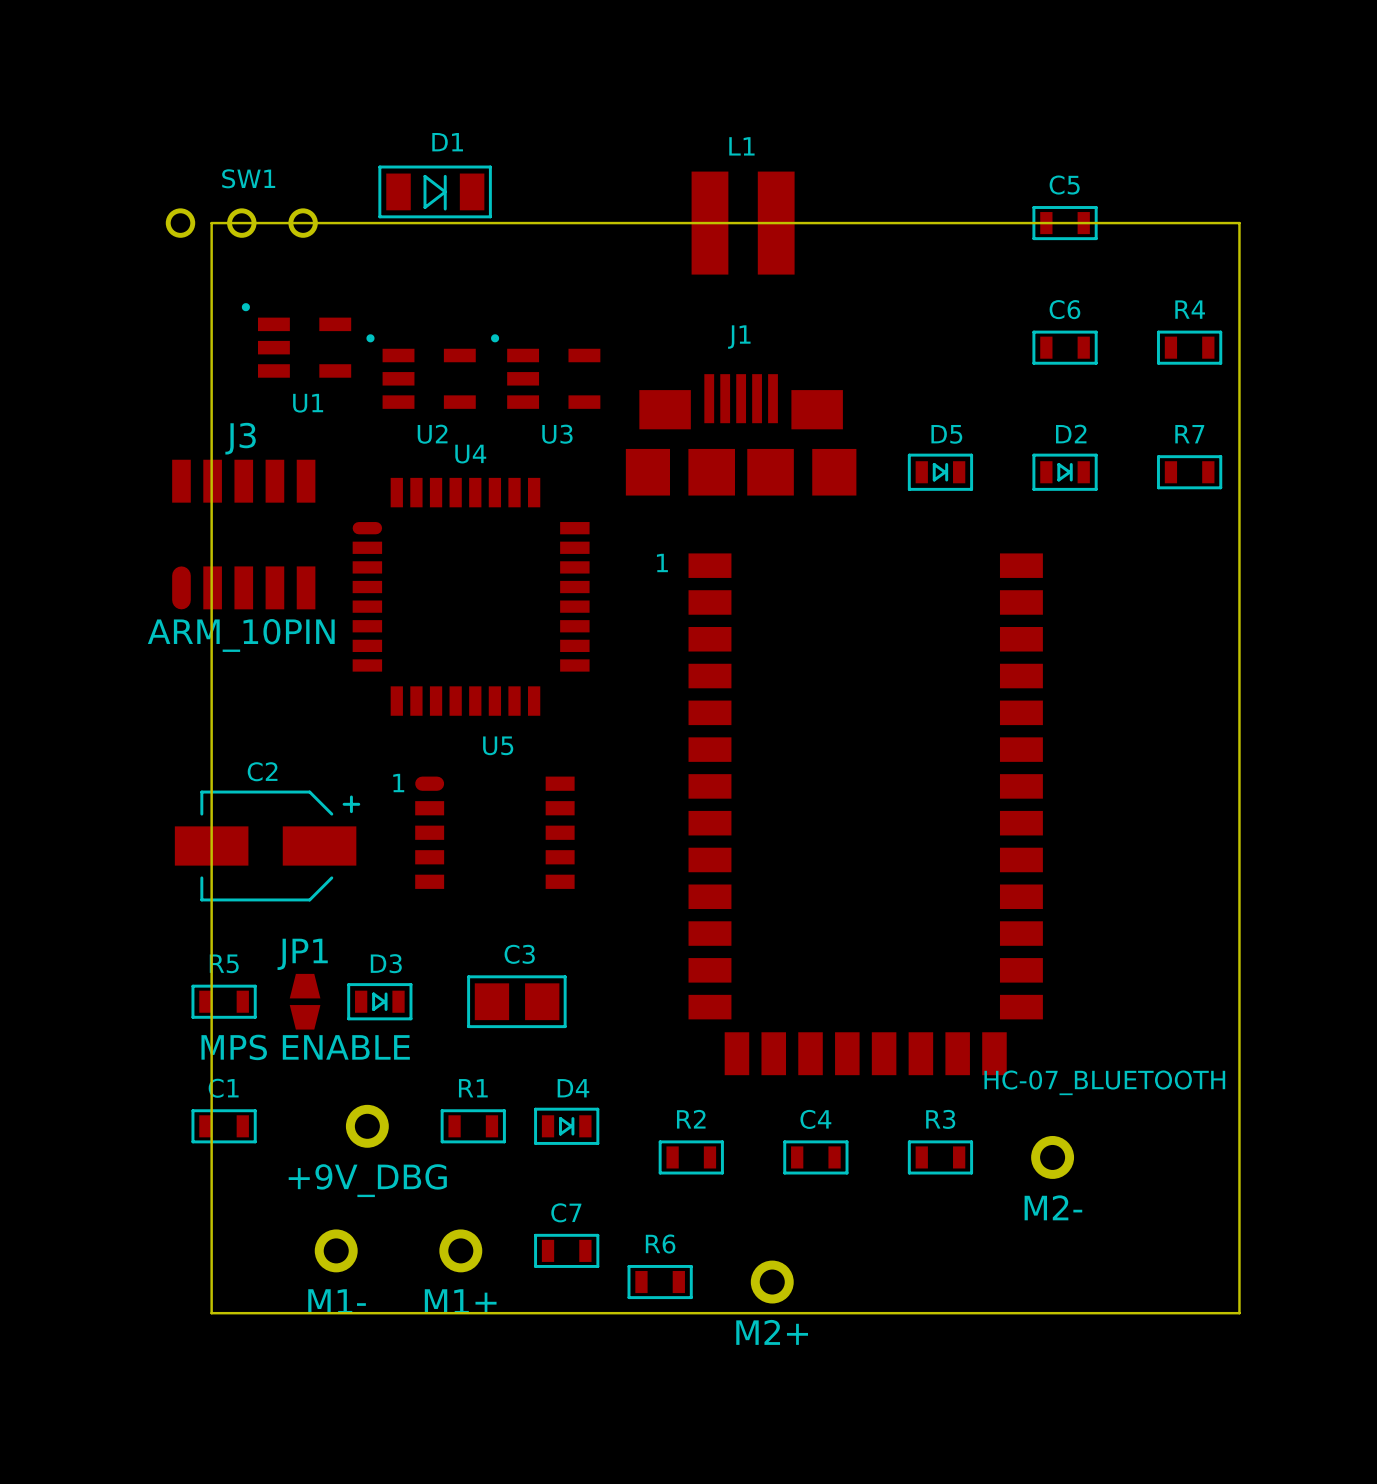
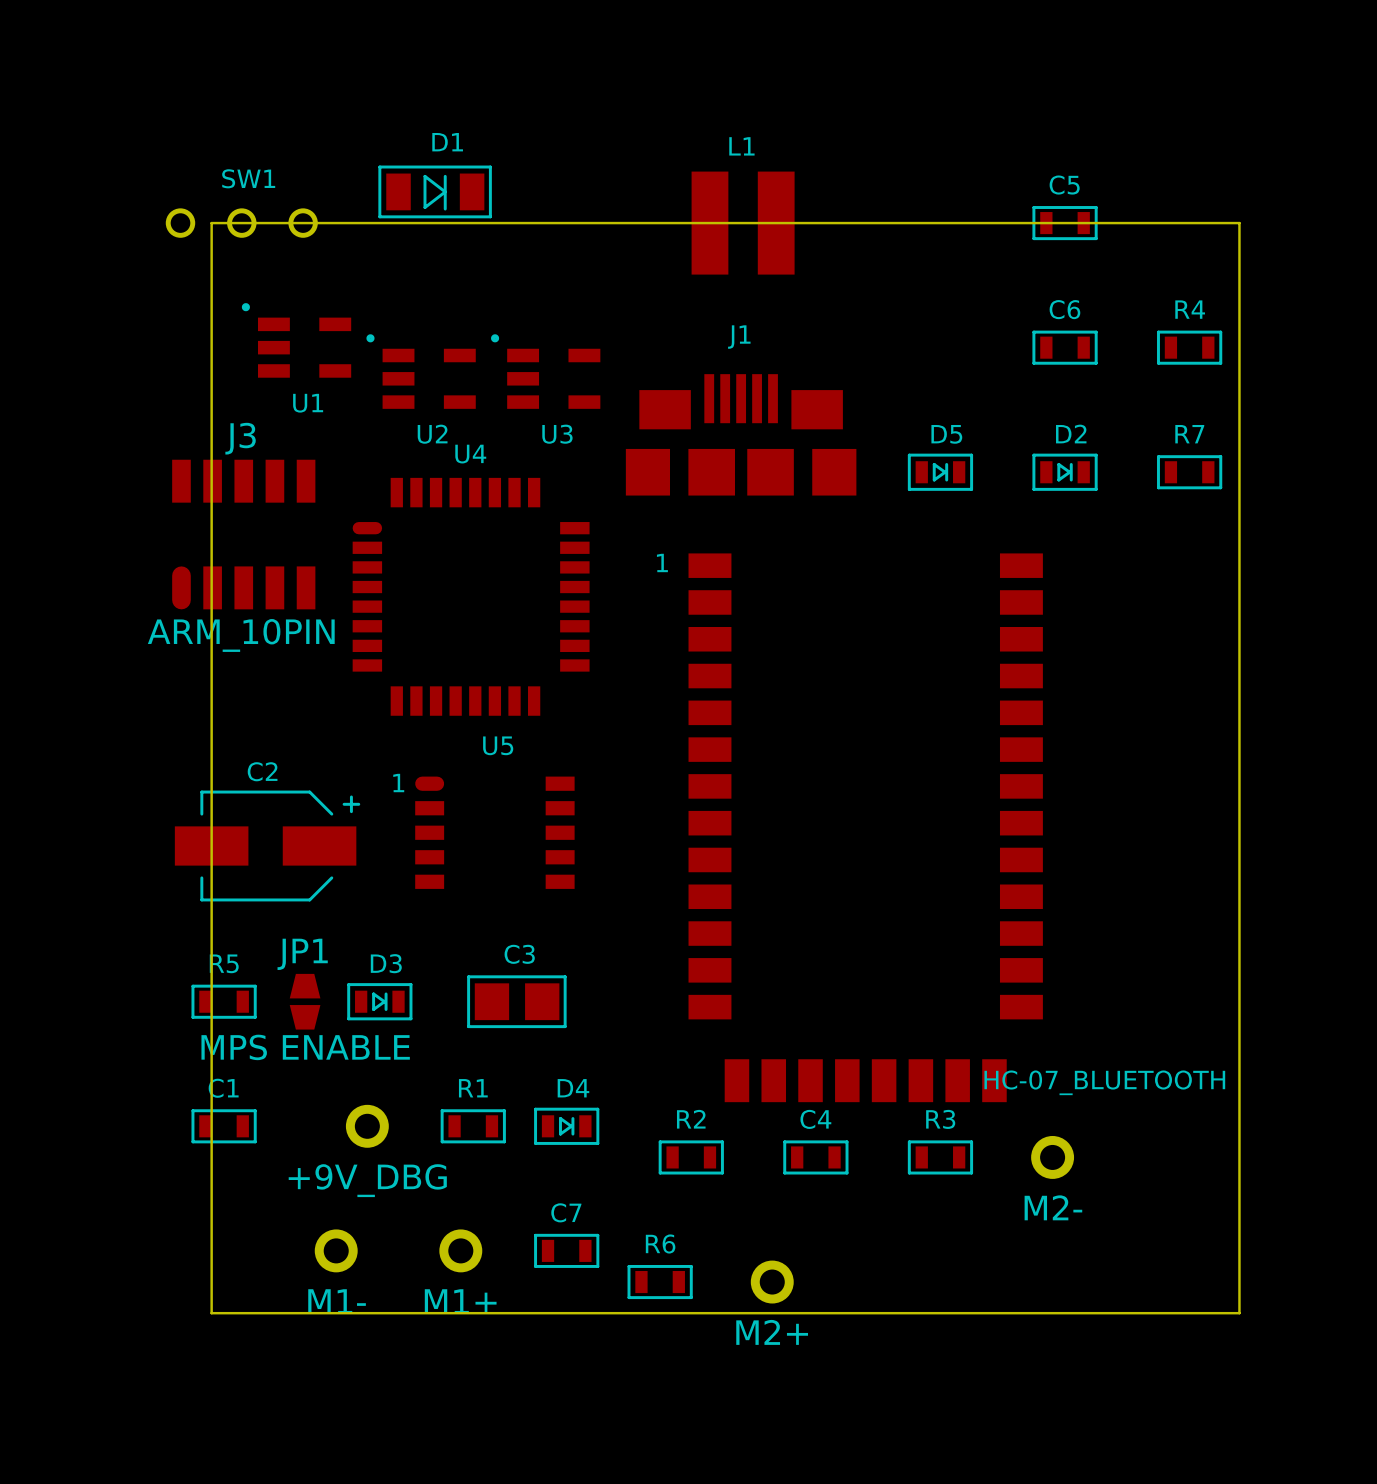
part footprint: [688, 553, 1043, 1076] -> [688, 553, 1043, 1103]

